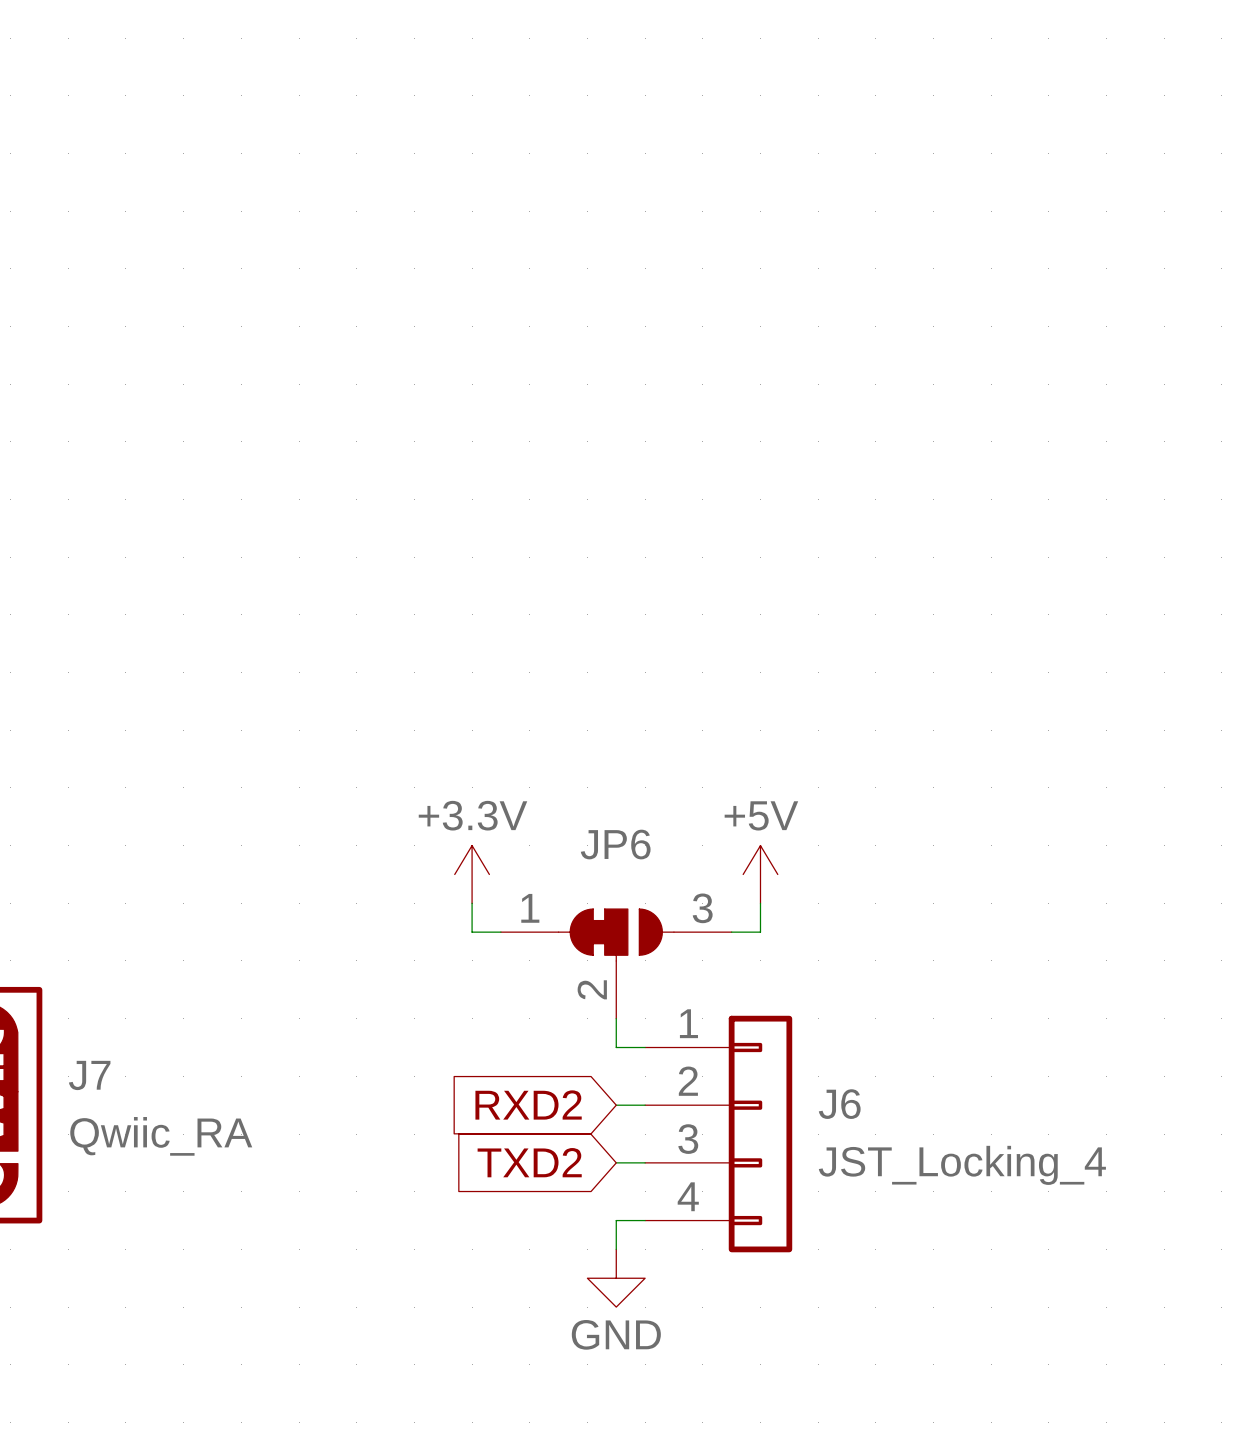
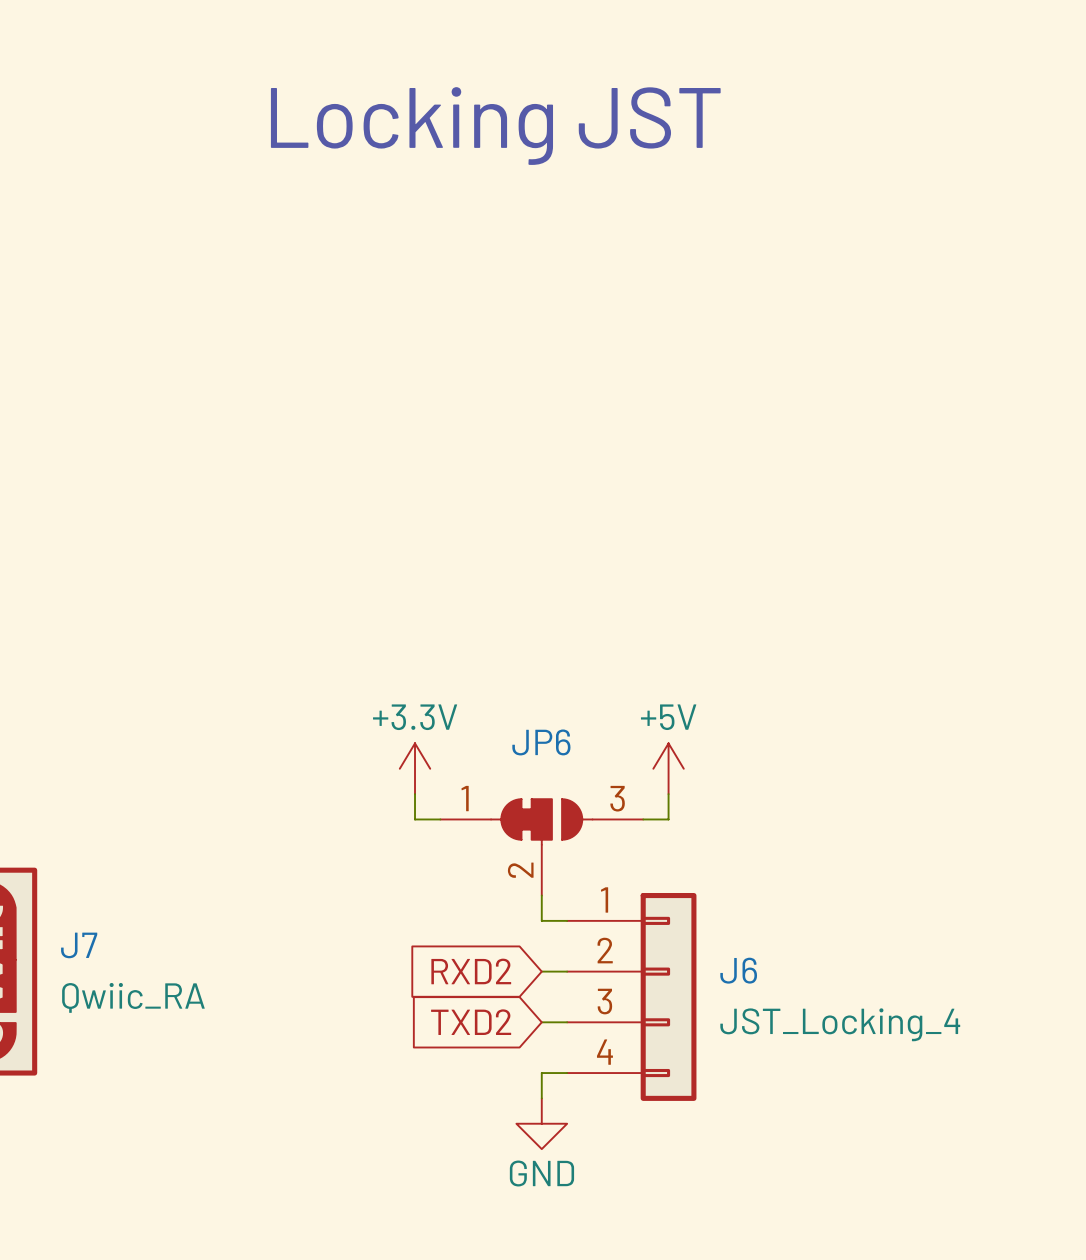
text: none -> Locking JST (495, 126)

